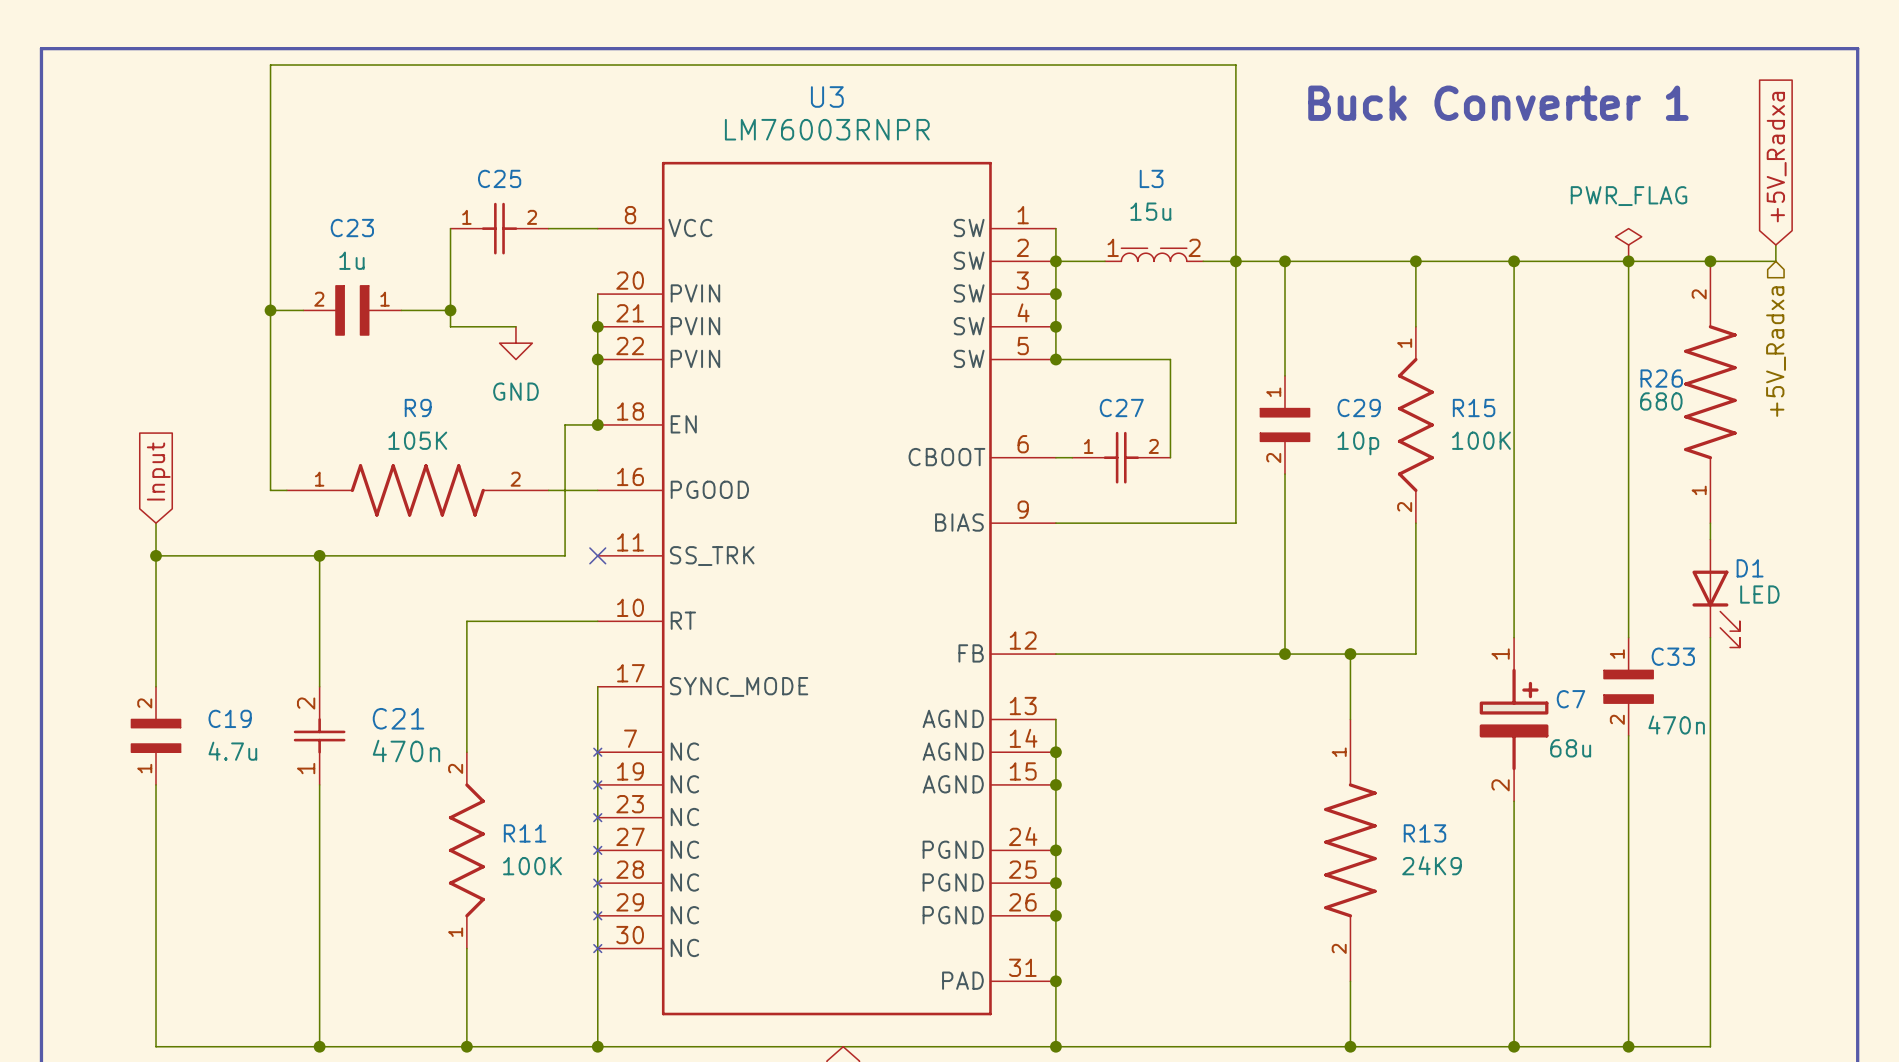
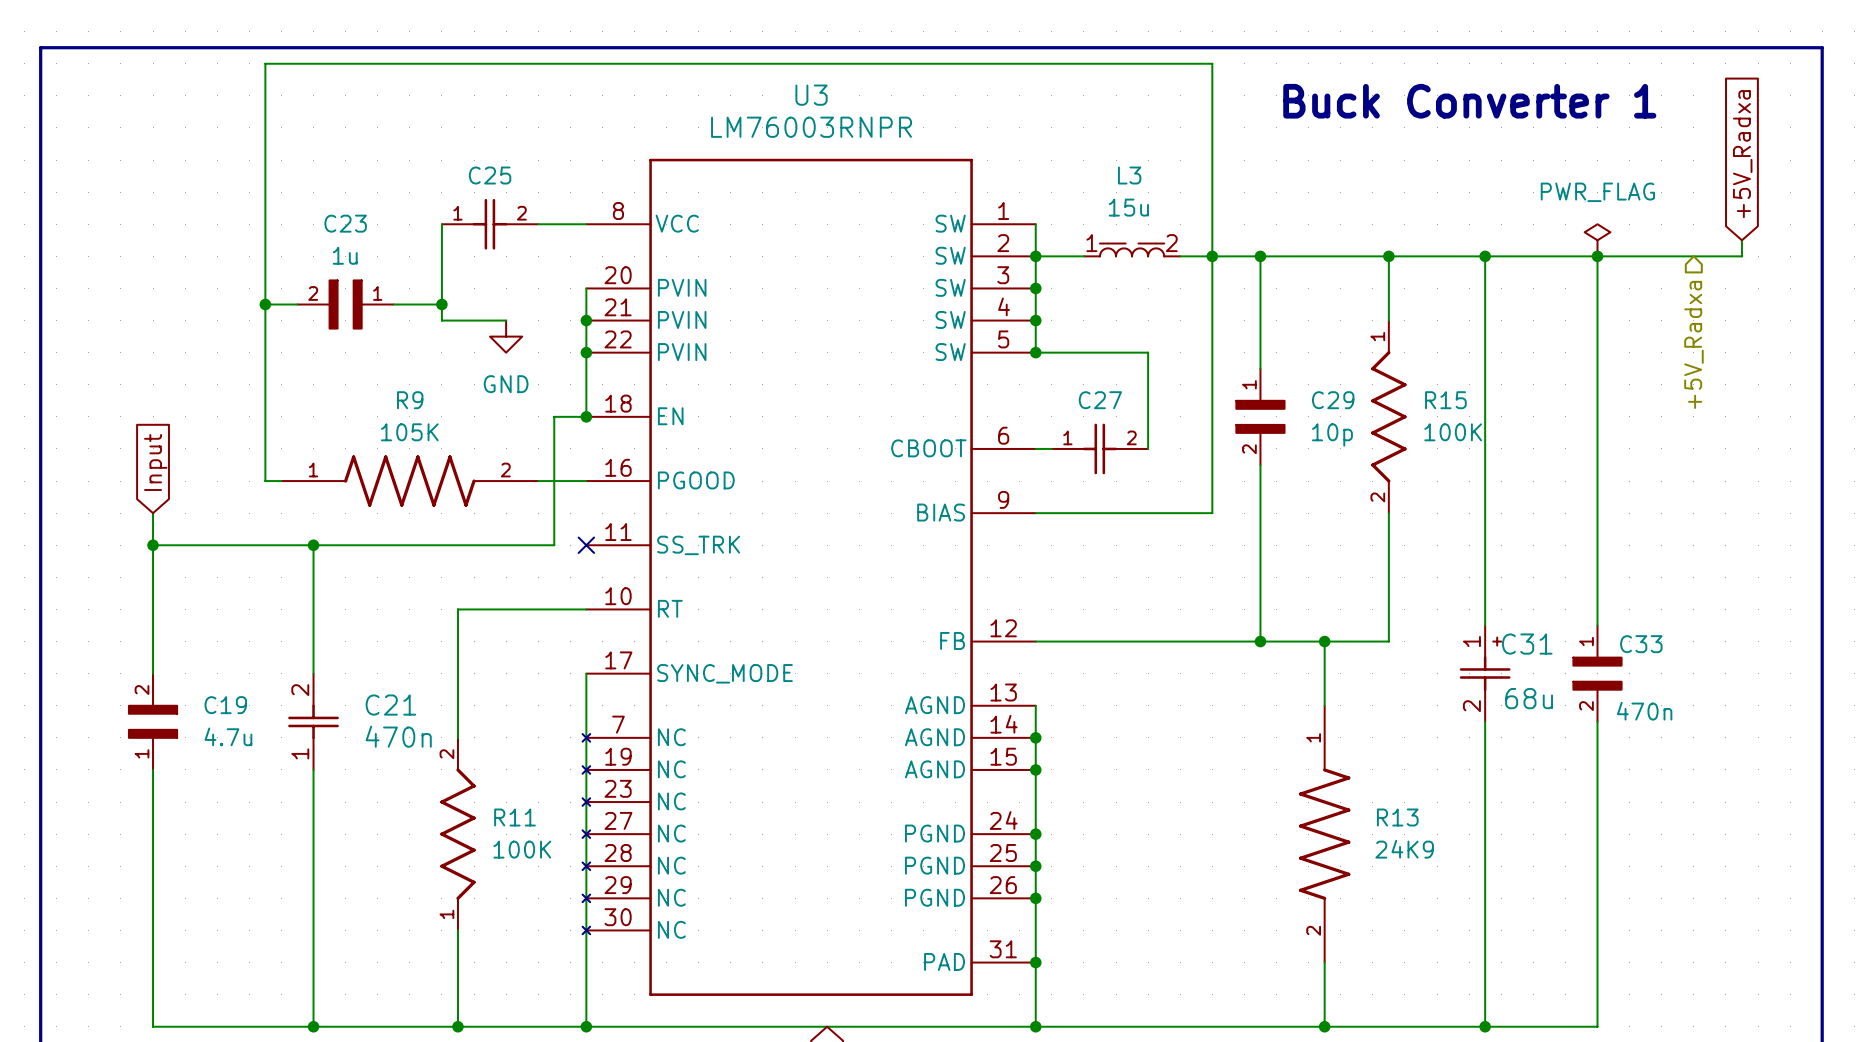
junction: (1710, 261) -> none
hierarchical label position: +5V_Radxa (1776, 351) -> +5V_Radxa (1693, 344)
R26: 680 (1710, 392) -> none
wire: (1710, 523) (1710, 539) -> none
D1: LED (1716, 593) -> none
wire: (1710, 637) (1710, 1046) (1628, 1046) -> none
C31: none -> 68u (1485, 673)
C7: 68u (1514, 719) -> none
junction: (1628, 1046) -> none

